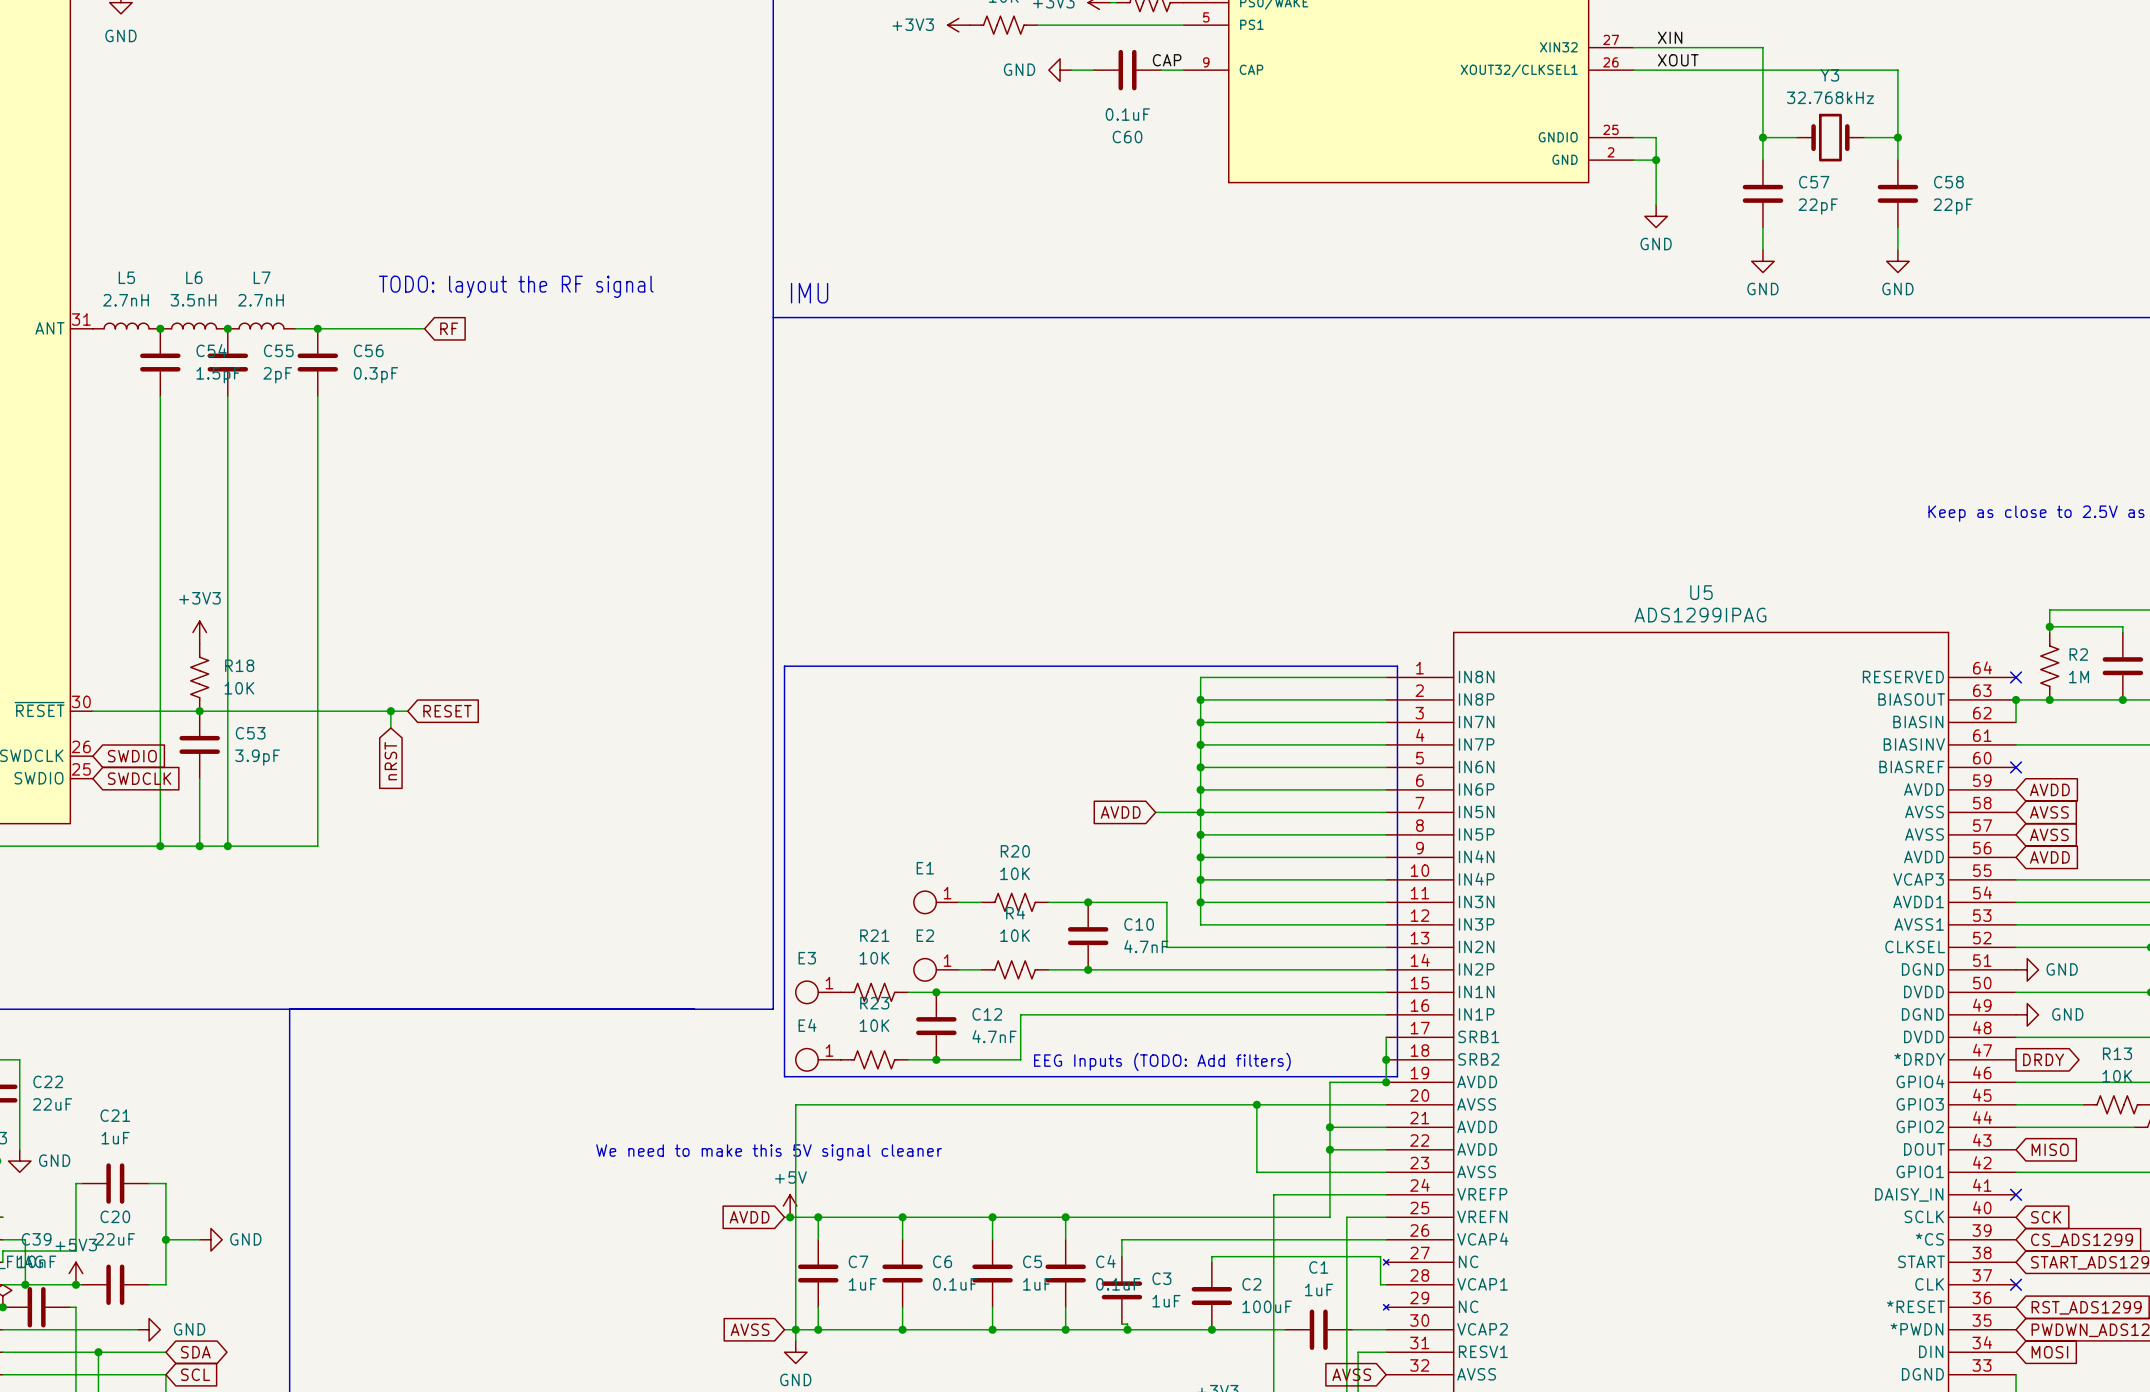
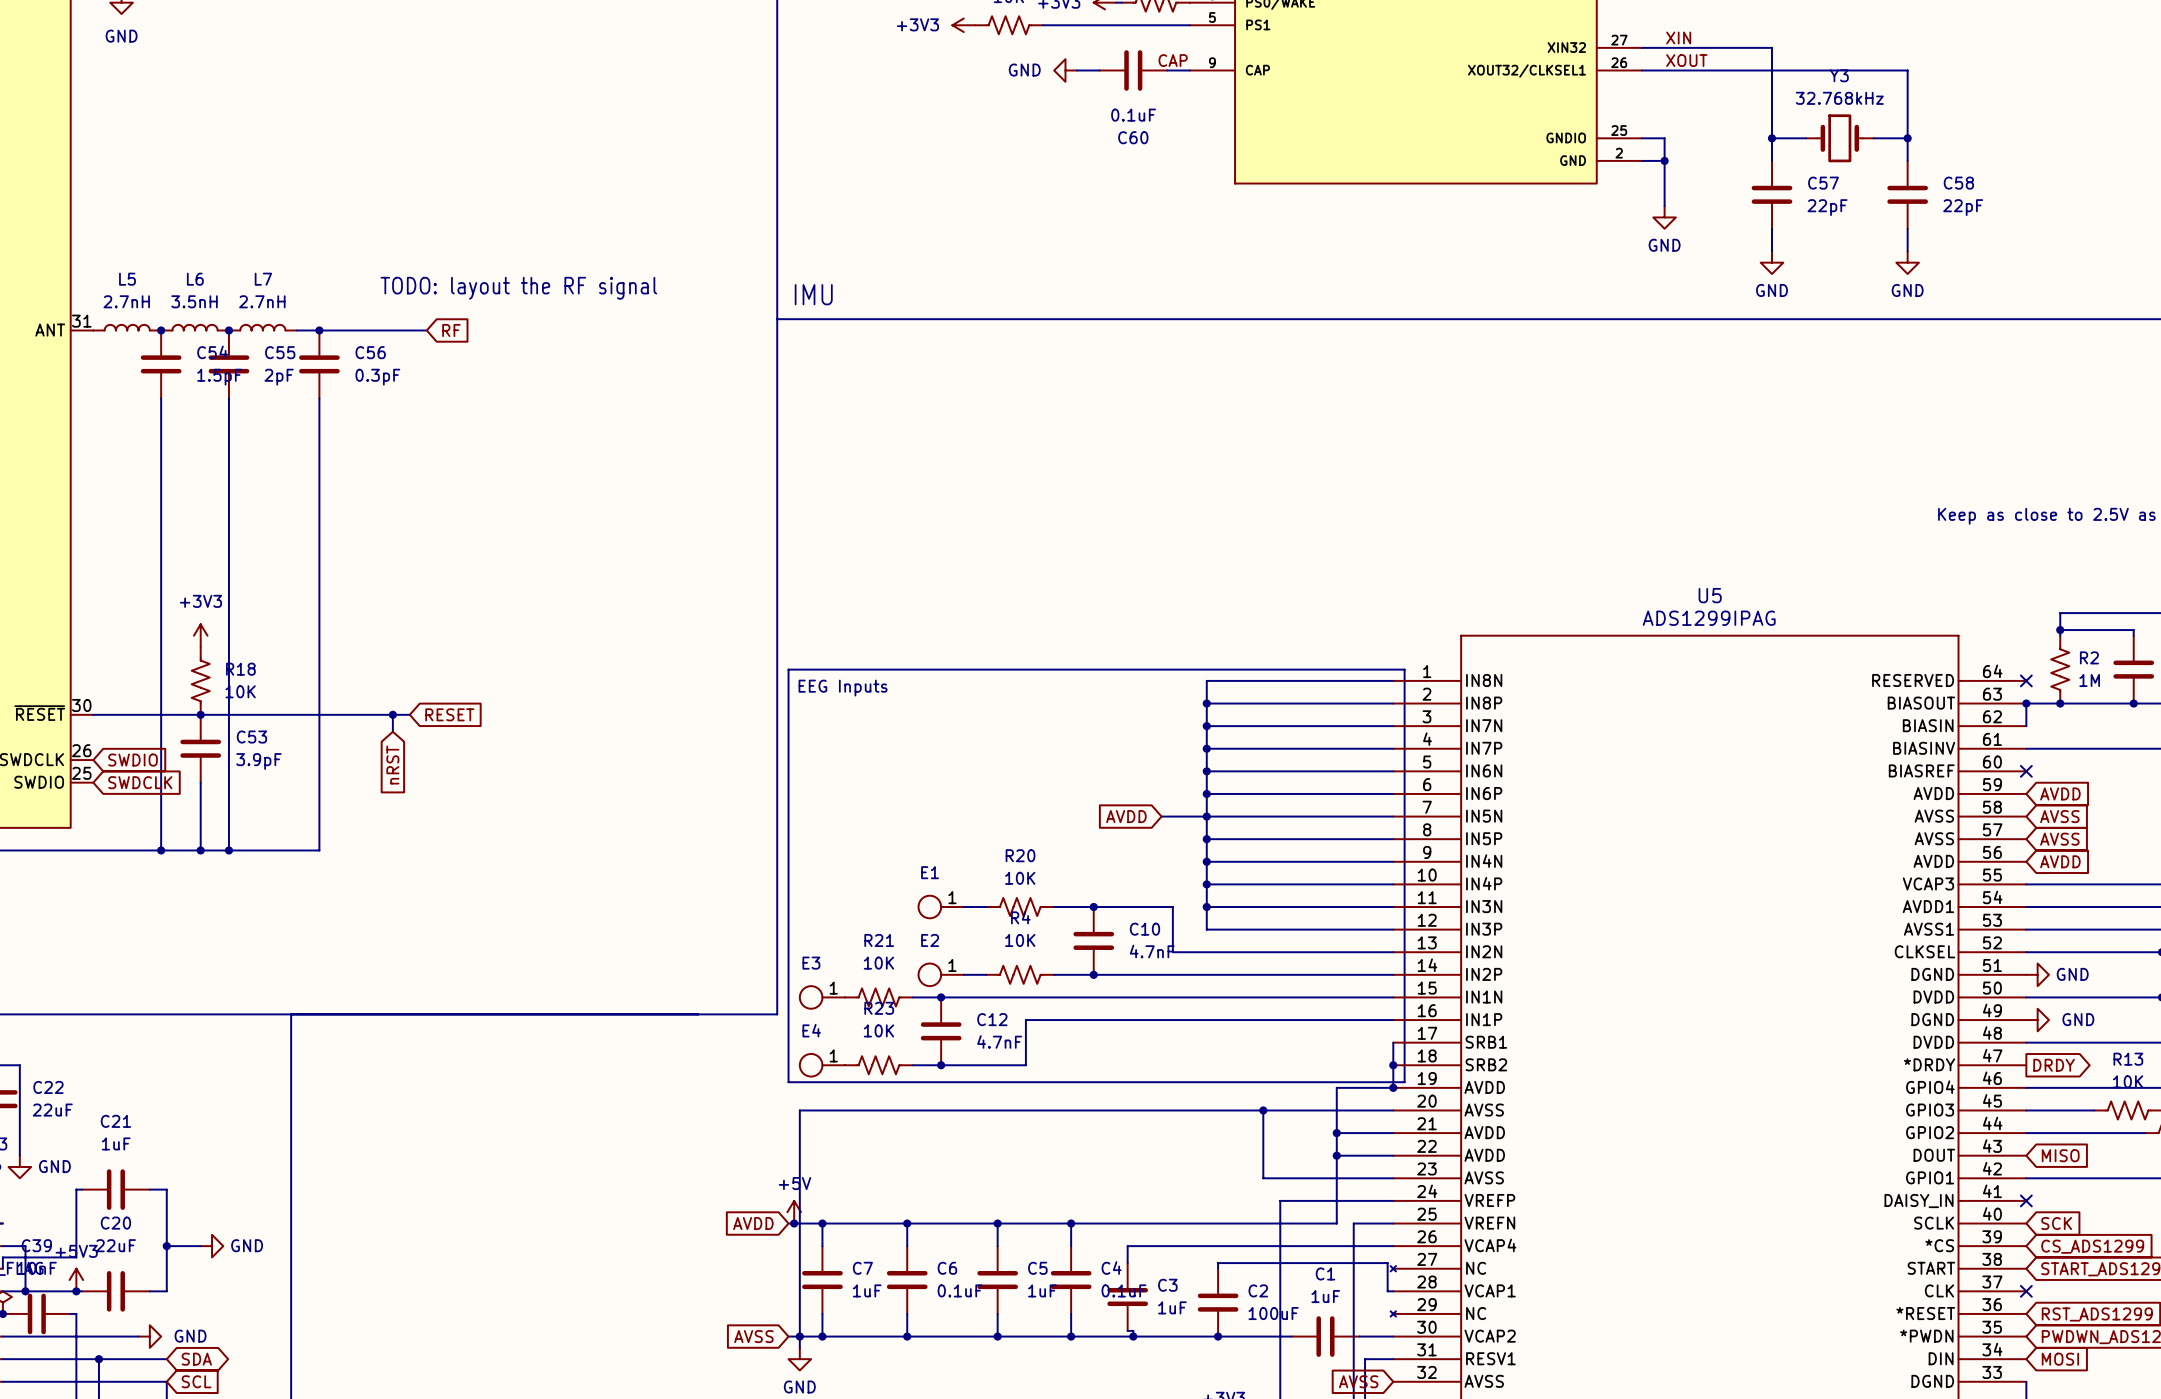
text: none -> EEG Inputs (843, 688)
text: EEG Inputs (TODO: Add filters) (1162, 1061) -> none
text: We need to make this 5V signal cleaner (769, 1152) -> none

